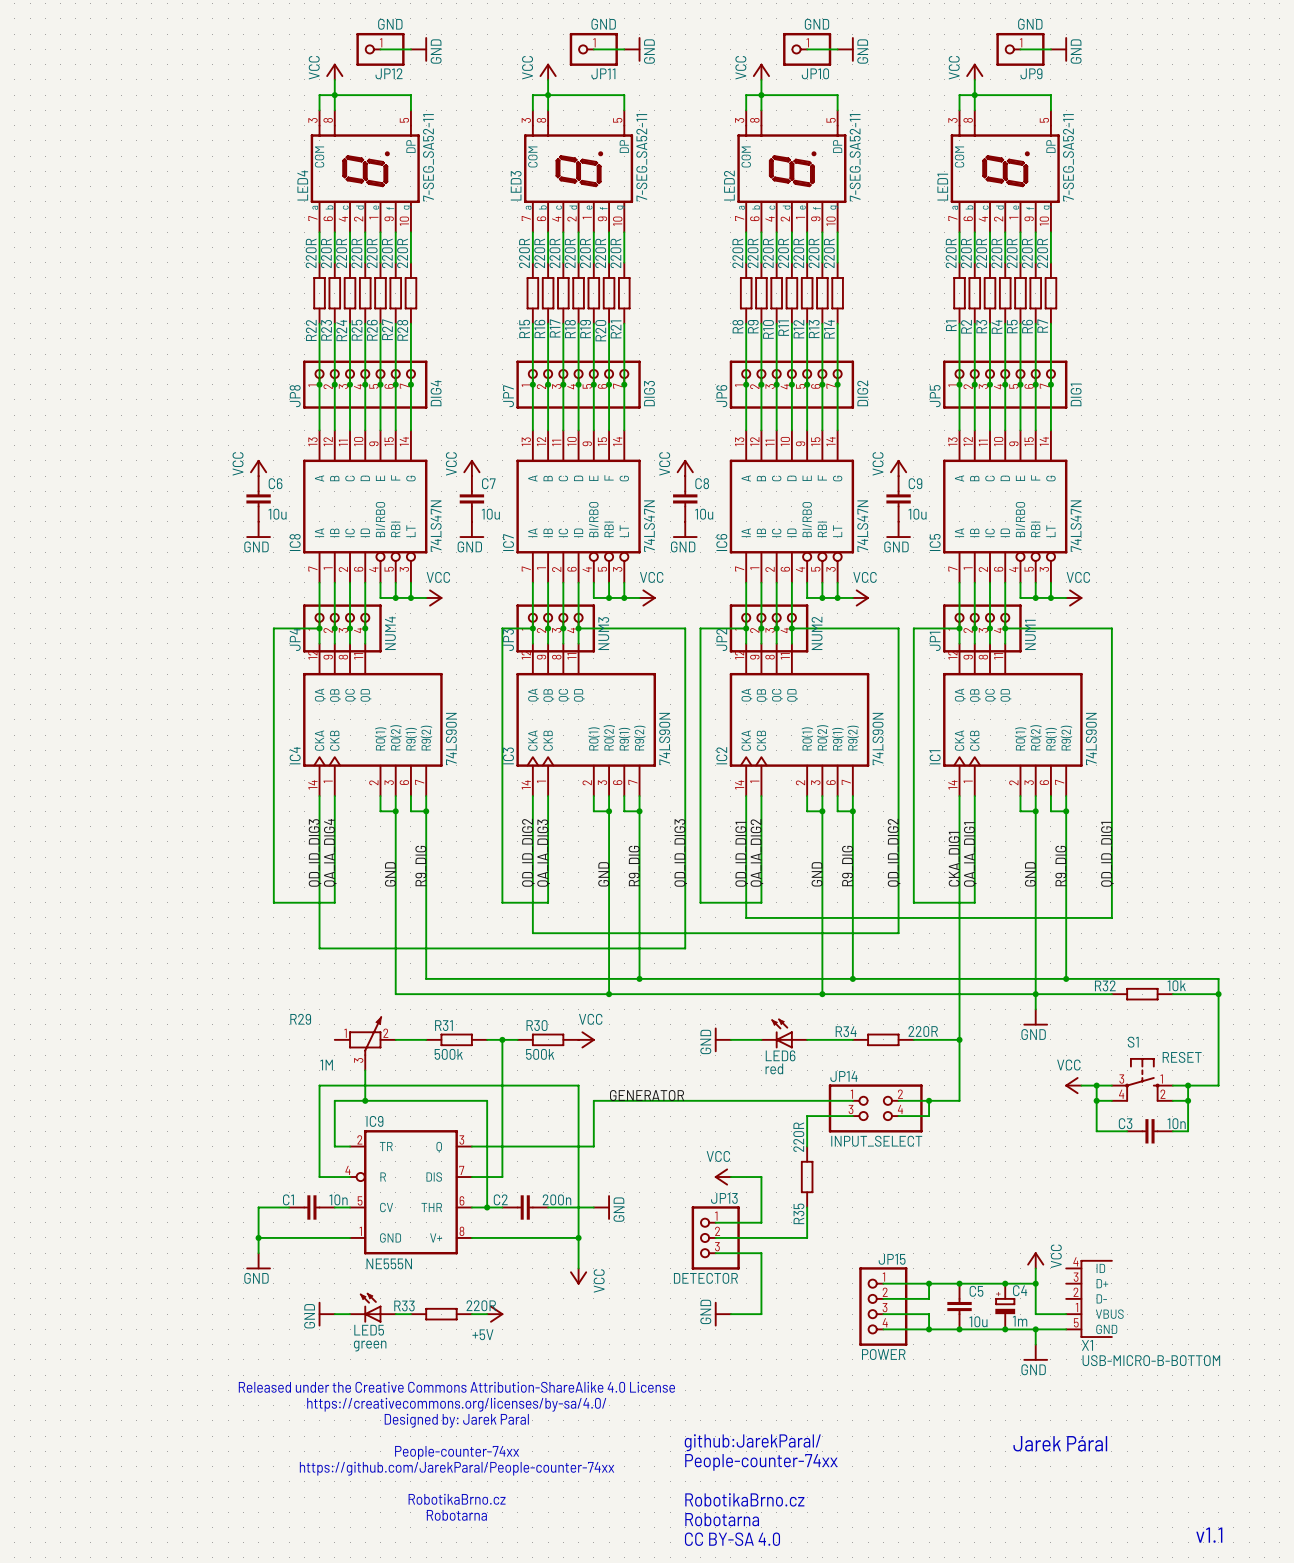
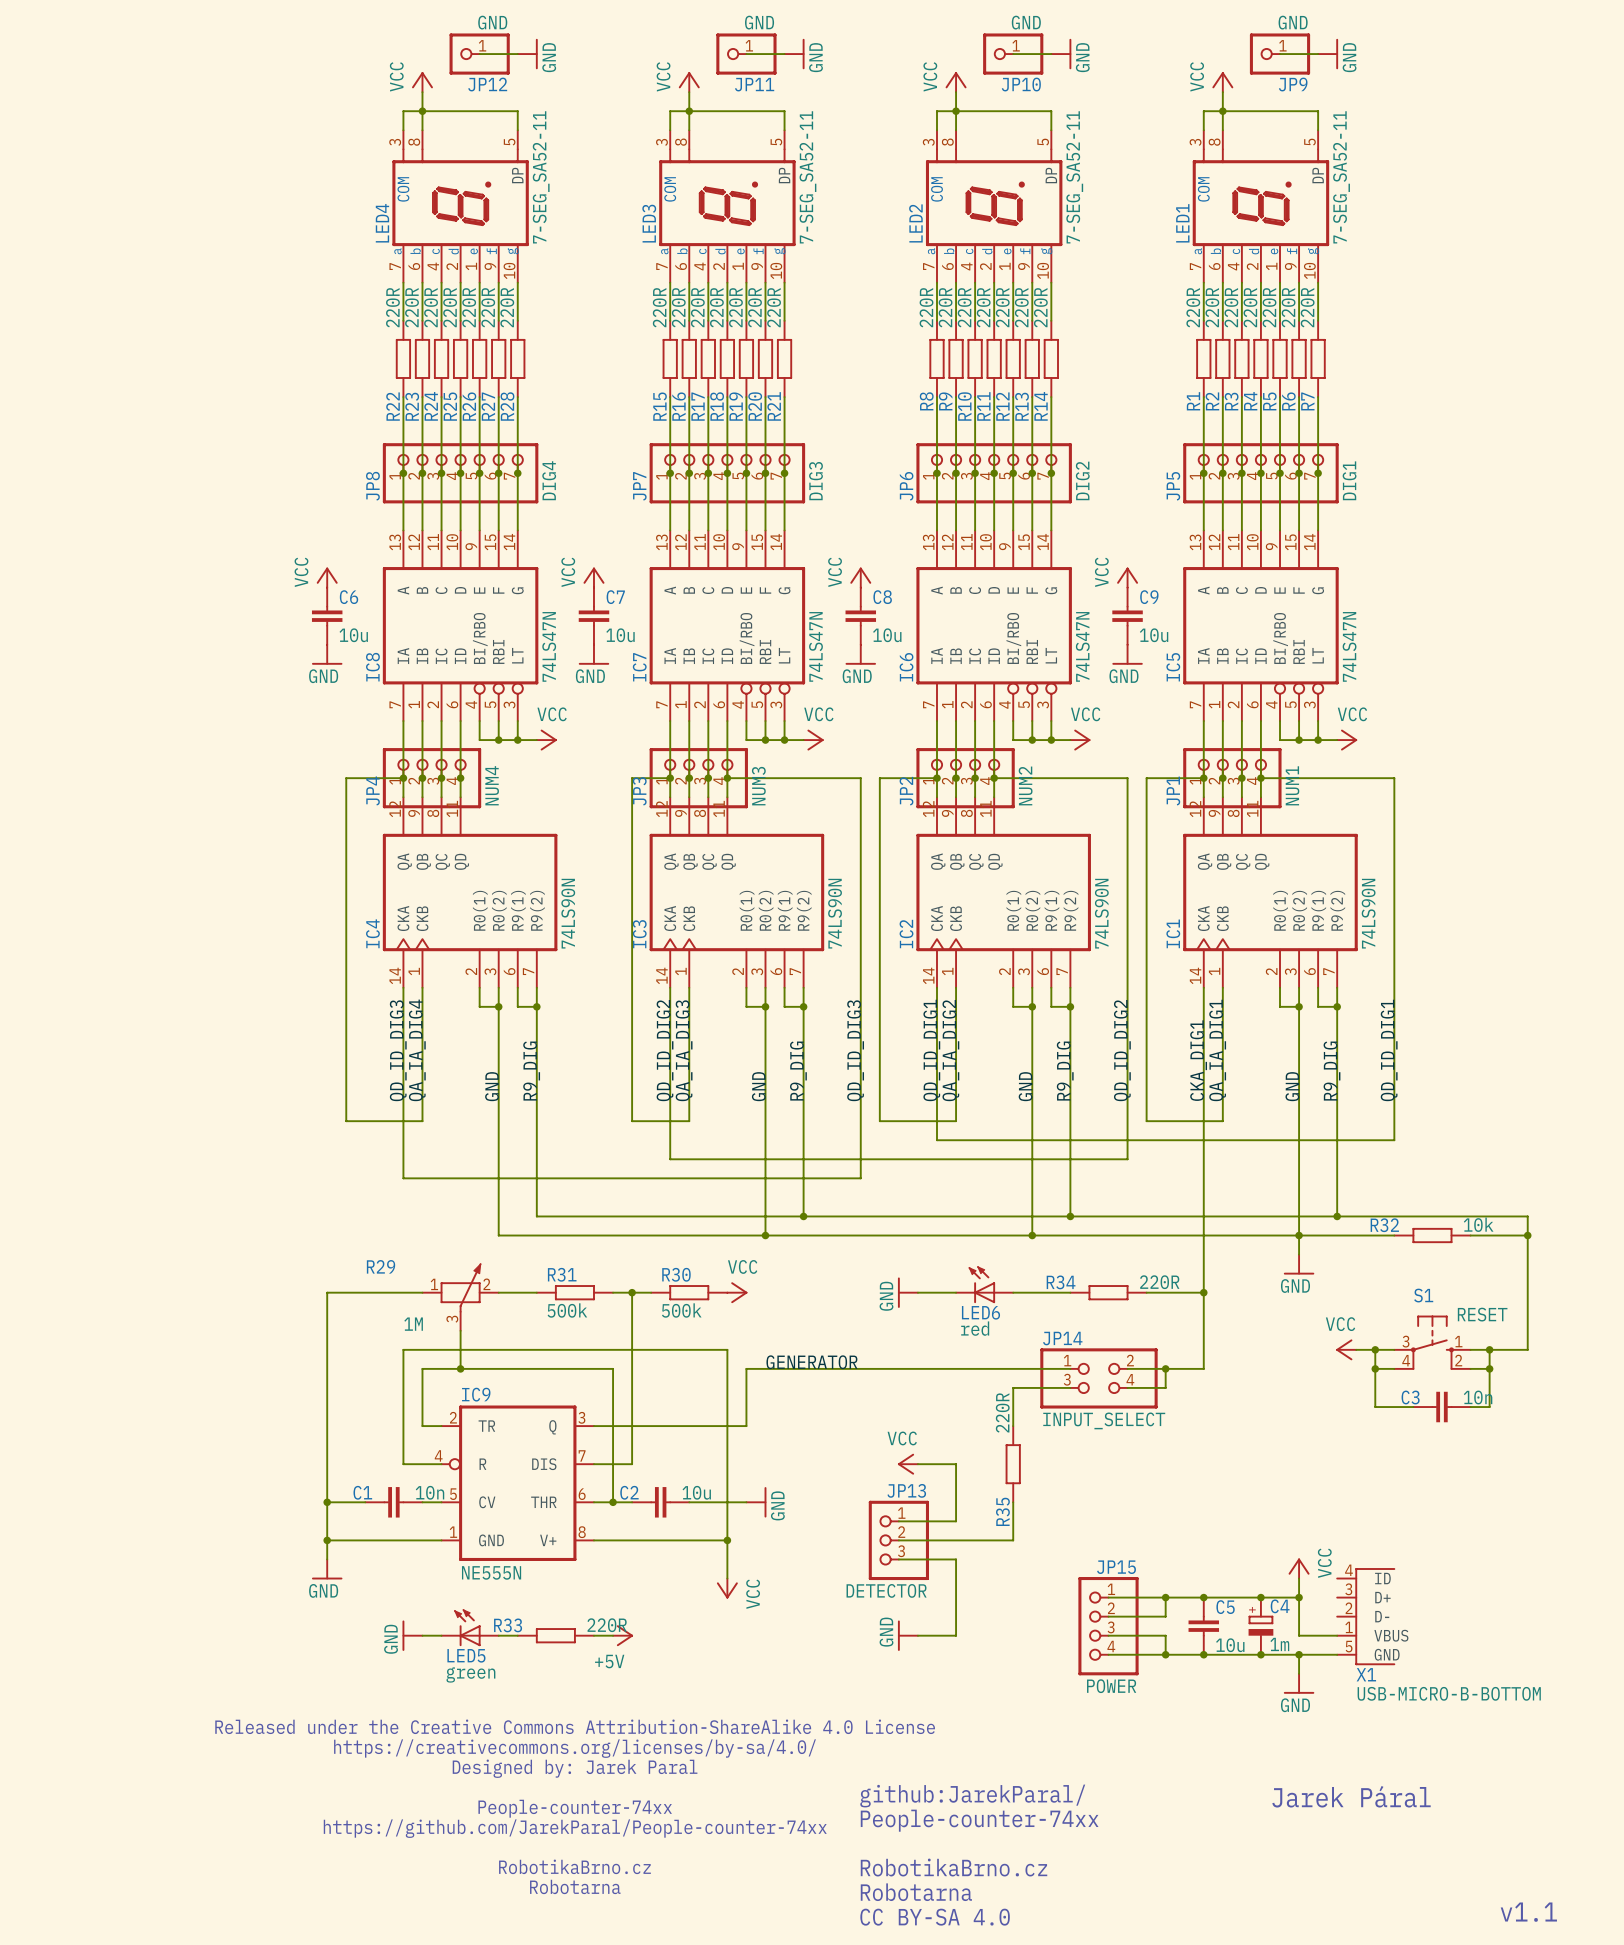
wire: none -> (422, 1292) (327, 1292) (327, 1502)
C2 value: 200n (557, 1199) -> 10u (696, 1492)
junction: none -> (327, 1502)

